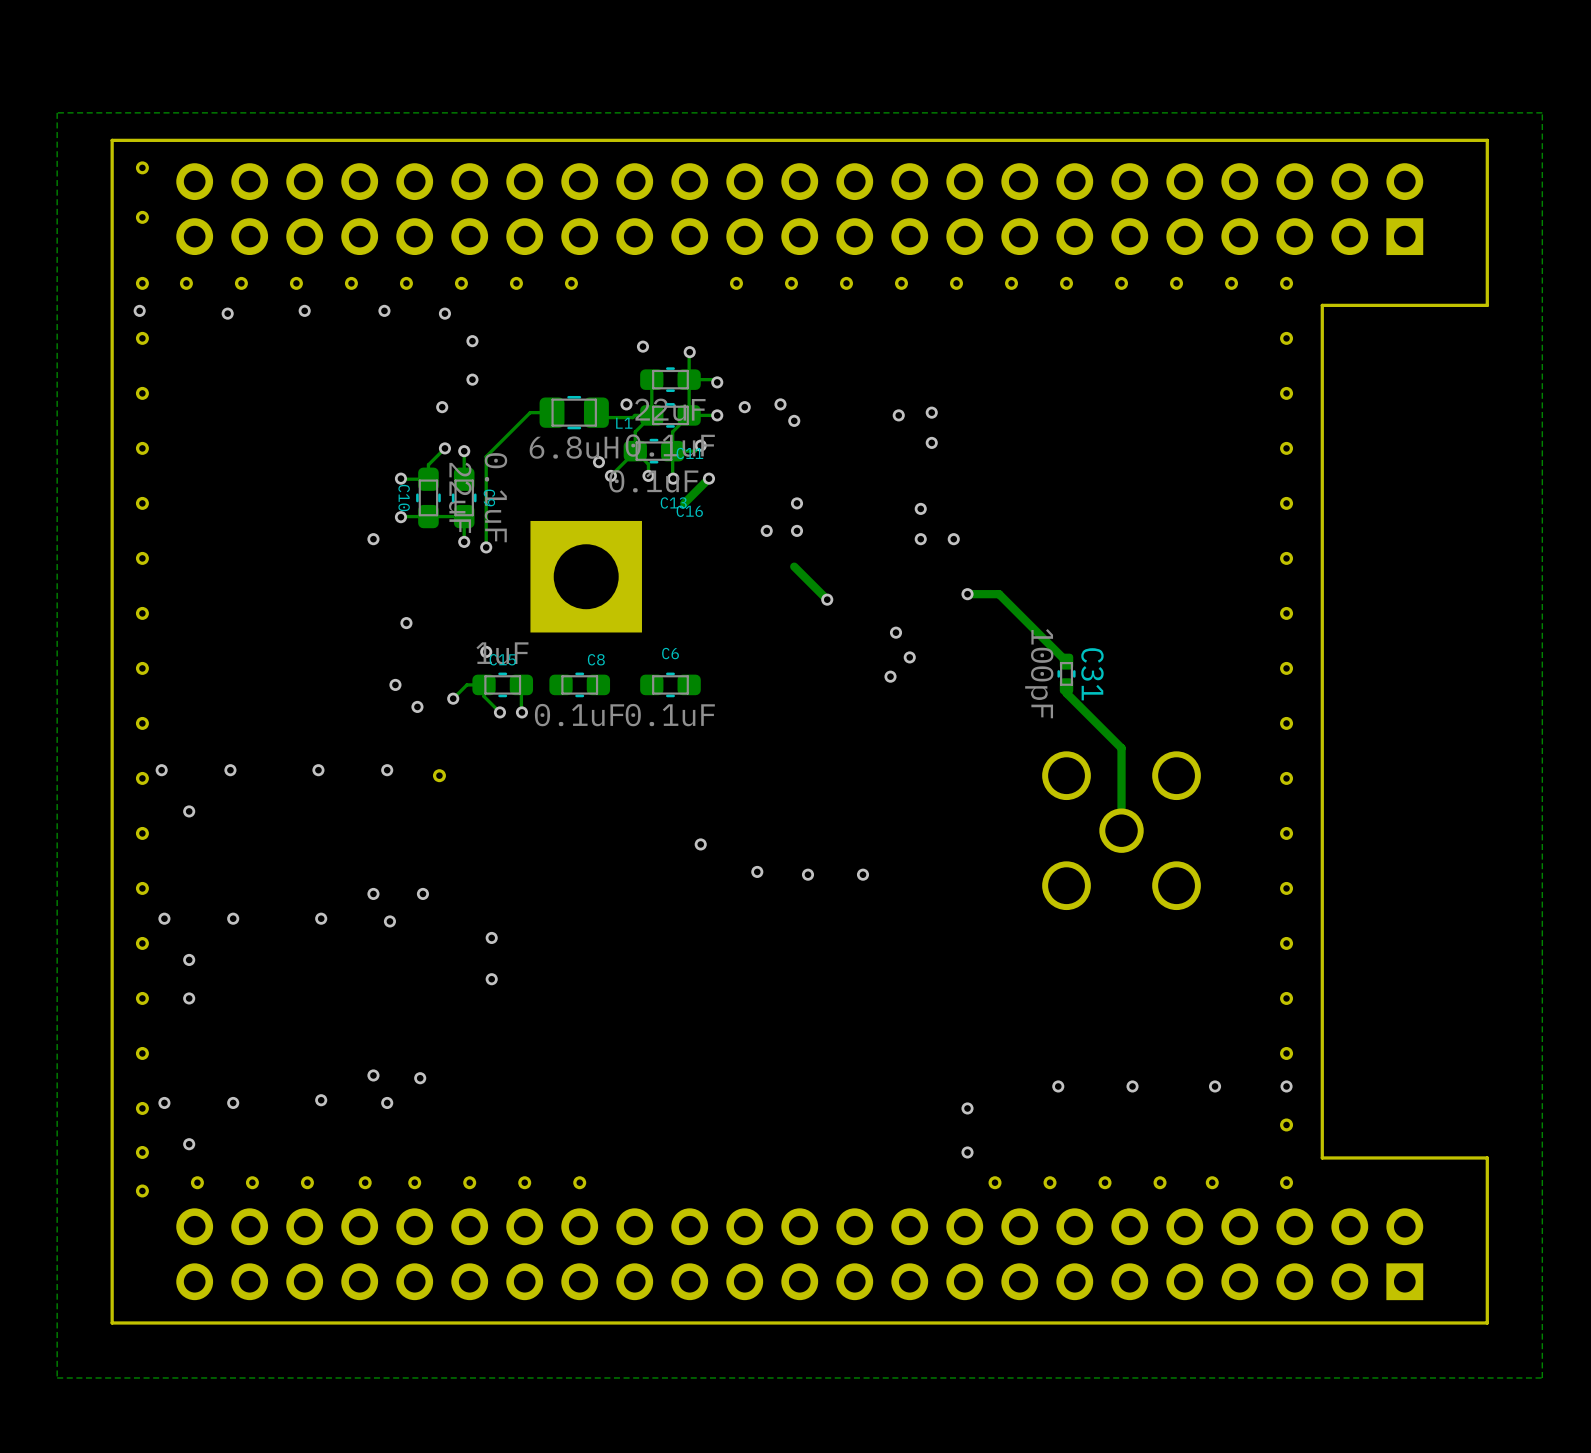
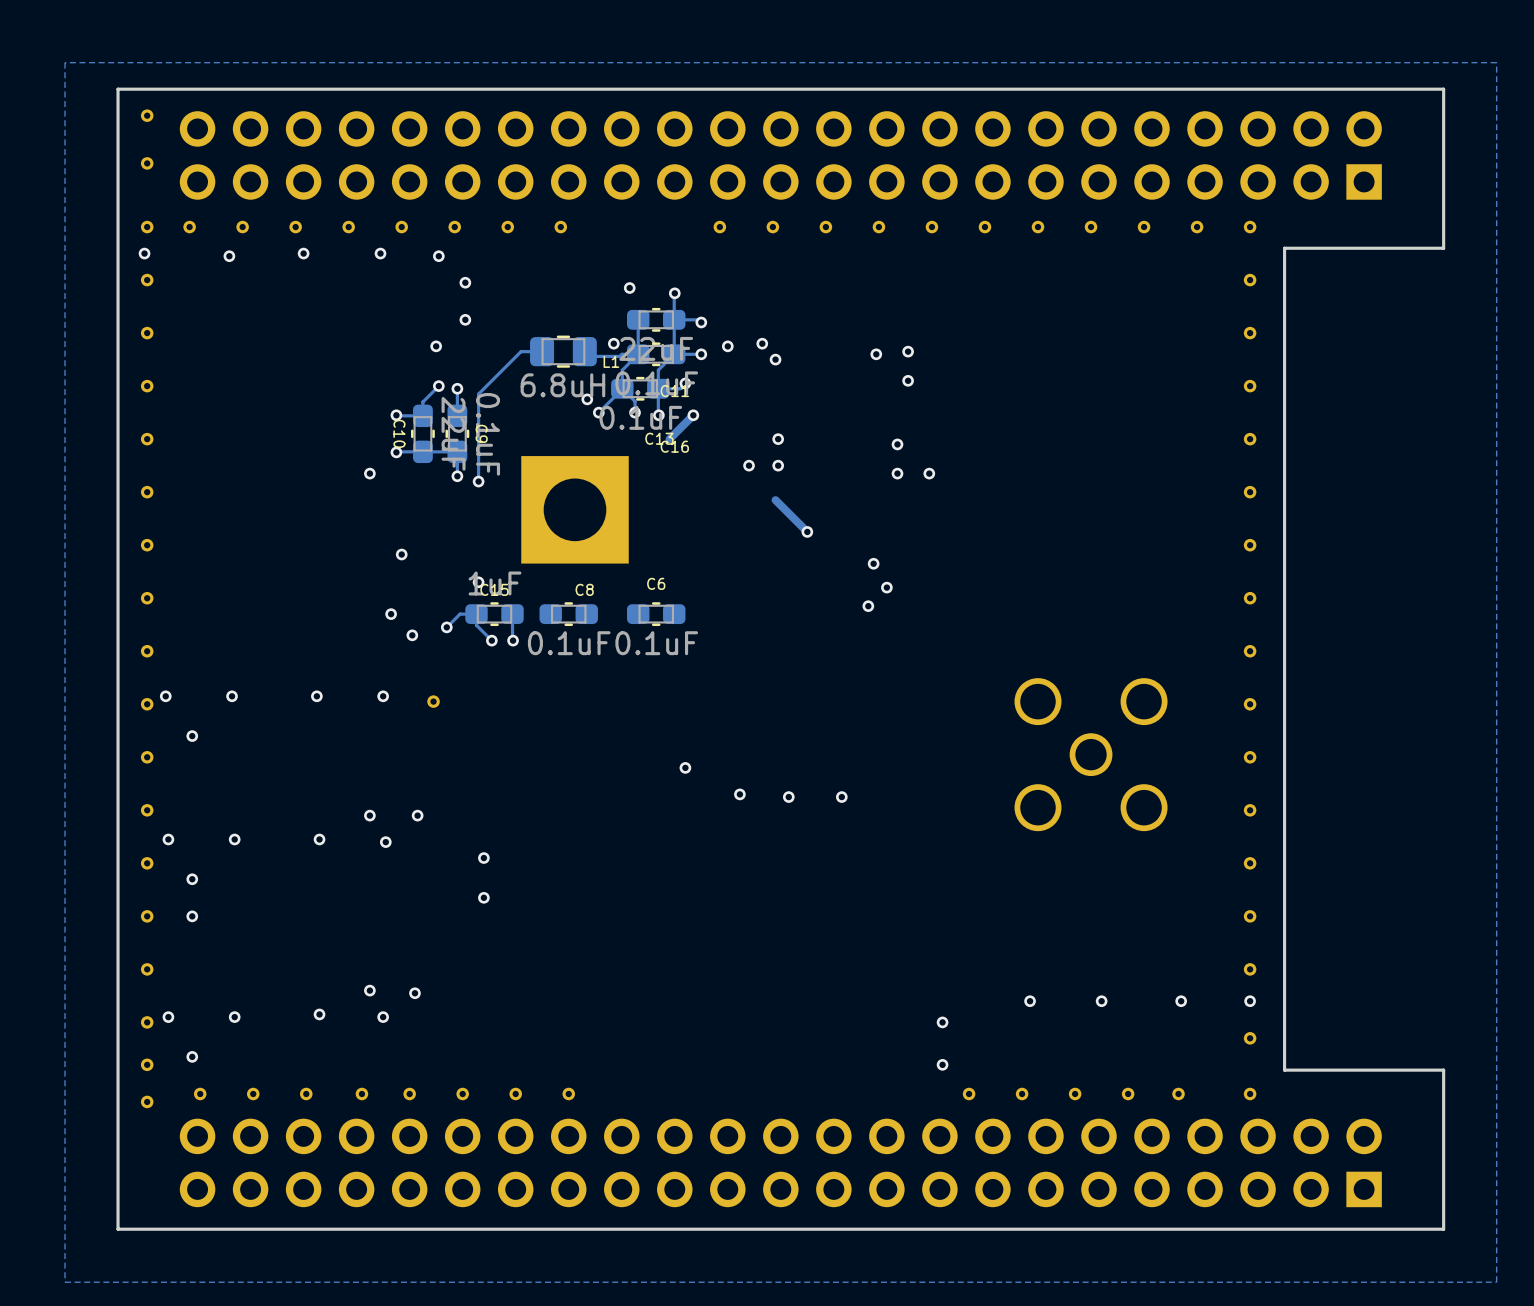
track: (967, 594) (999, 594) (1066, 661) -> none
via: (967, 594) -> none
C31: 100pF (1066, 673) -> none
track: (1066, 687) (1066, 693) (1121, 748) (1121, 830) -> none

